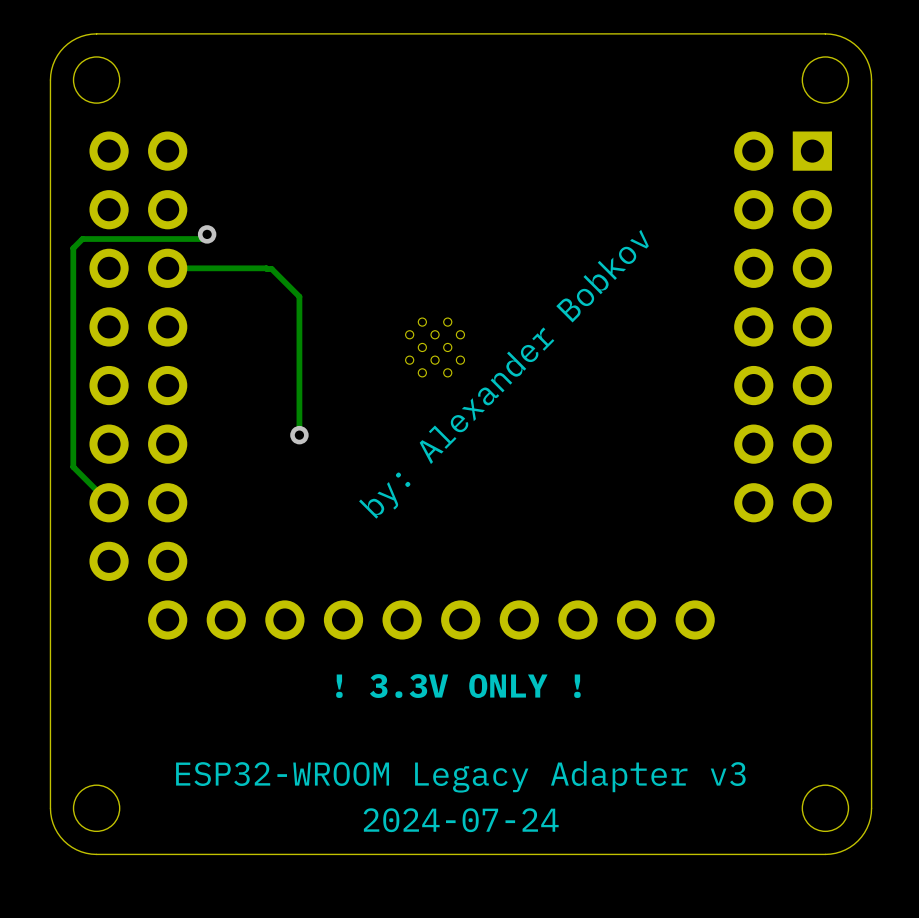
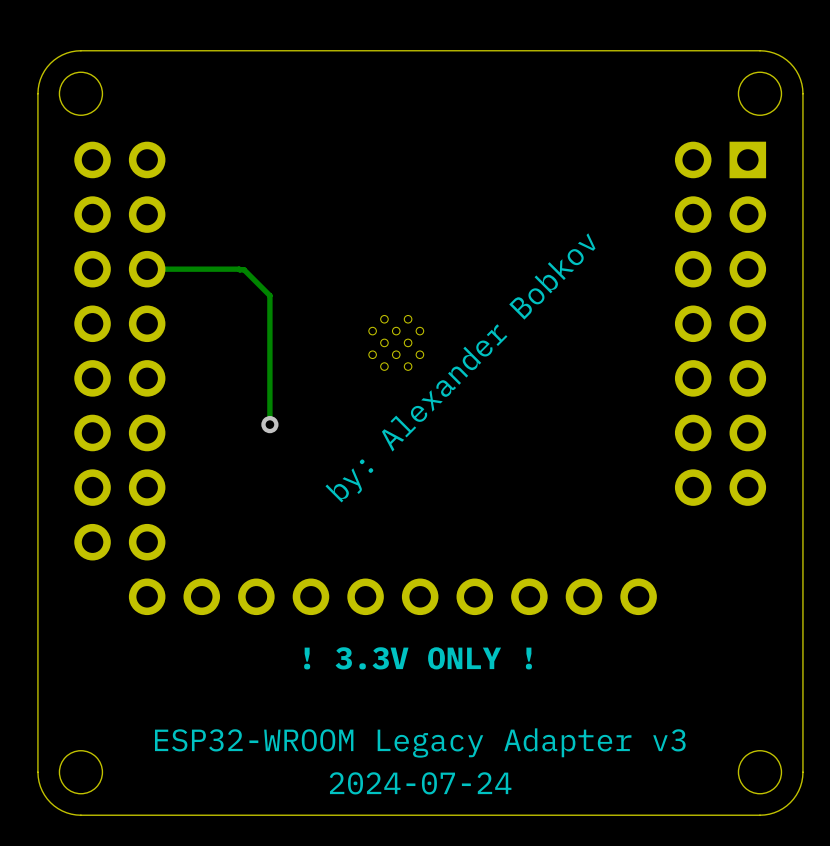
track: (207, 234) (202, 239) (82, 239) (73, 248) (73, 466) (109, 502) -> none
via: (207, 234) -> none

